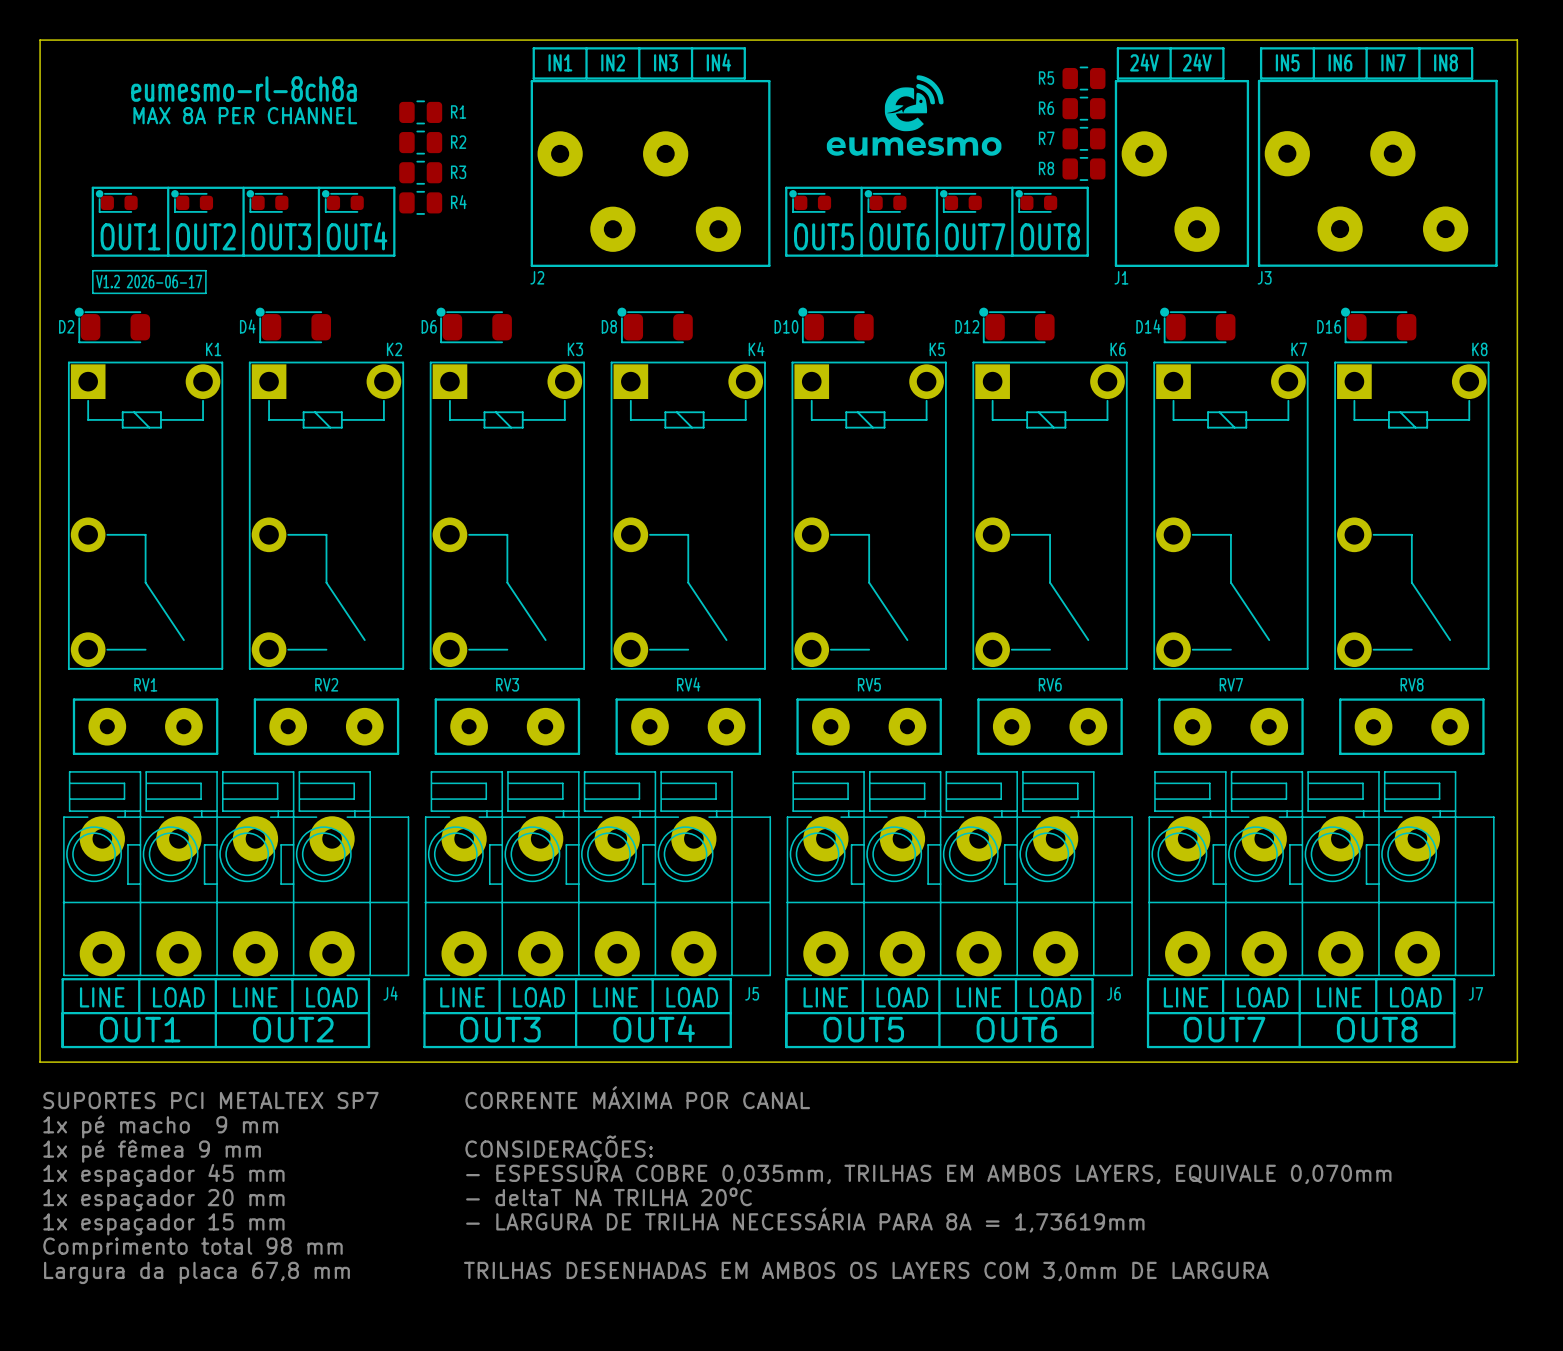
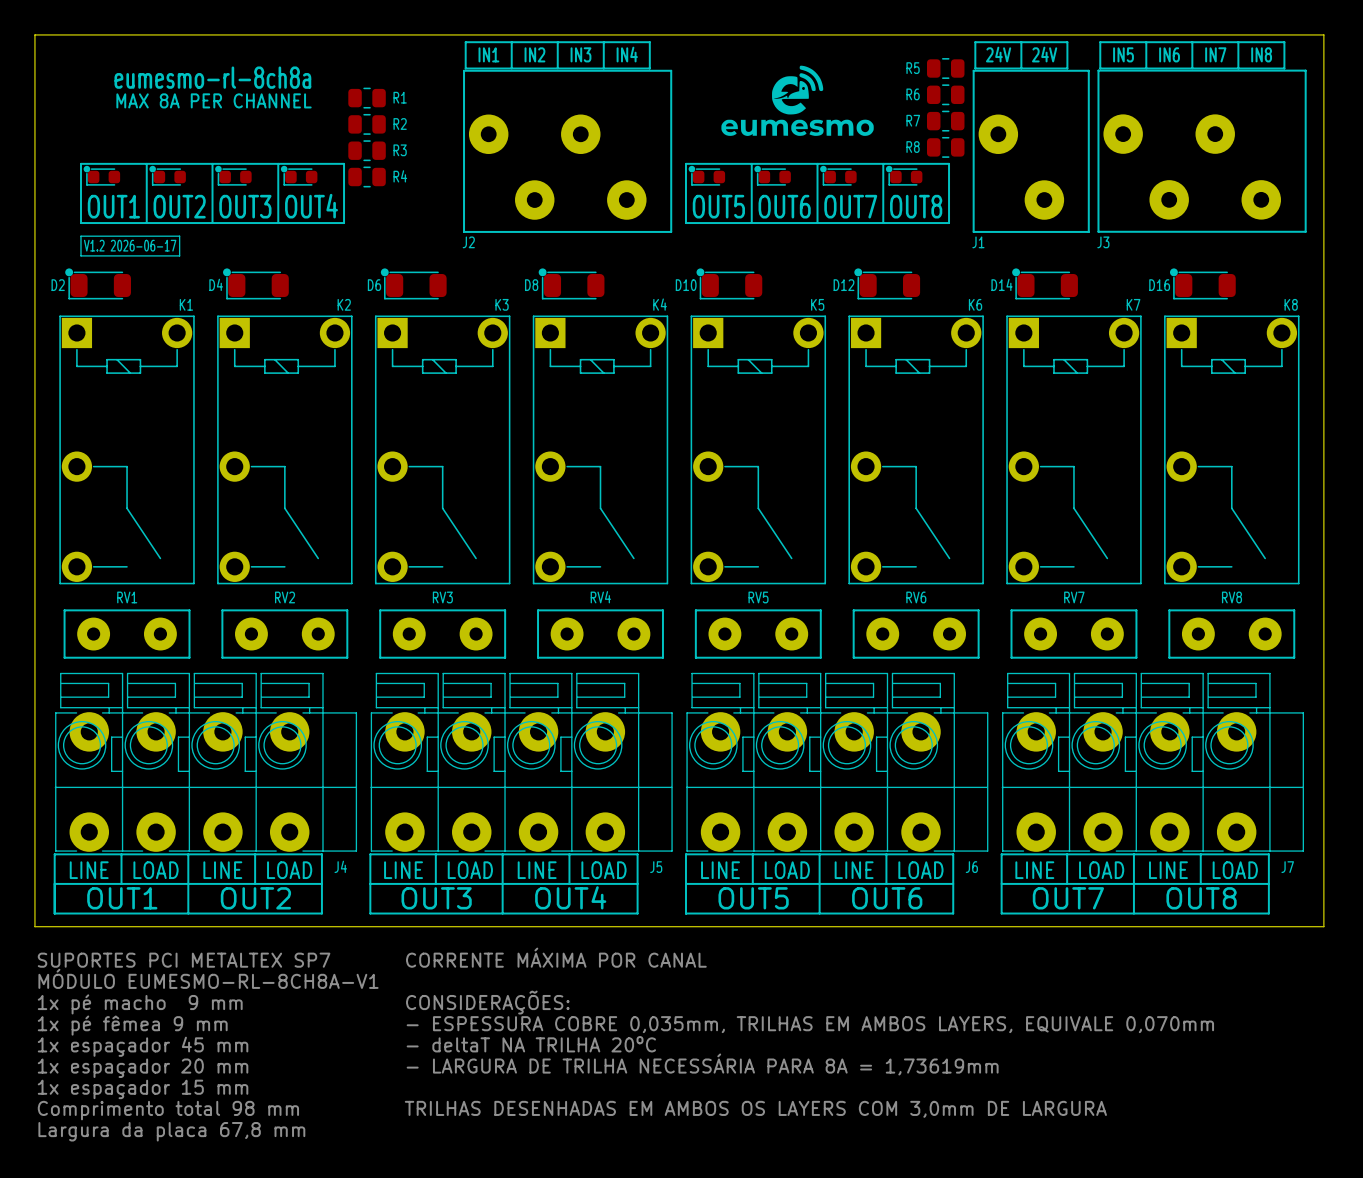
text: 1x pé macho 9 mm (160, 1126) -> MÓDULO EUMESMO-RL-8CH8A-V1 (208, 978)
text: 1x pé fêmea 9 mm (152, 1151) -> 1x pé macho 9 mm (140, 1004)
text: 1x espaçador 45 mm (163, 1175) -> 1x pé fêmea 9 mm (132, 1025)
text: 1x espaçador 20 mm (163, 1200) -> 1x espaçador 45 mm (143, 1046)
text: 1x espaçador 15 mm (163, 1224) -> 1x espaçador 20 mm (143, 1068)
text: Comprimento total 98 mm (193, 1248) -> 1x espaçador 15 mm (143, 1089)
text: Largura da placa 67,8 mm (196, 1272) -> Comprimento total 98 mm (168, 1110)
text: none -> Largura da placa 67,8 mm (171, 1131)

